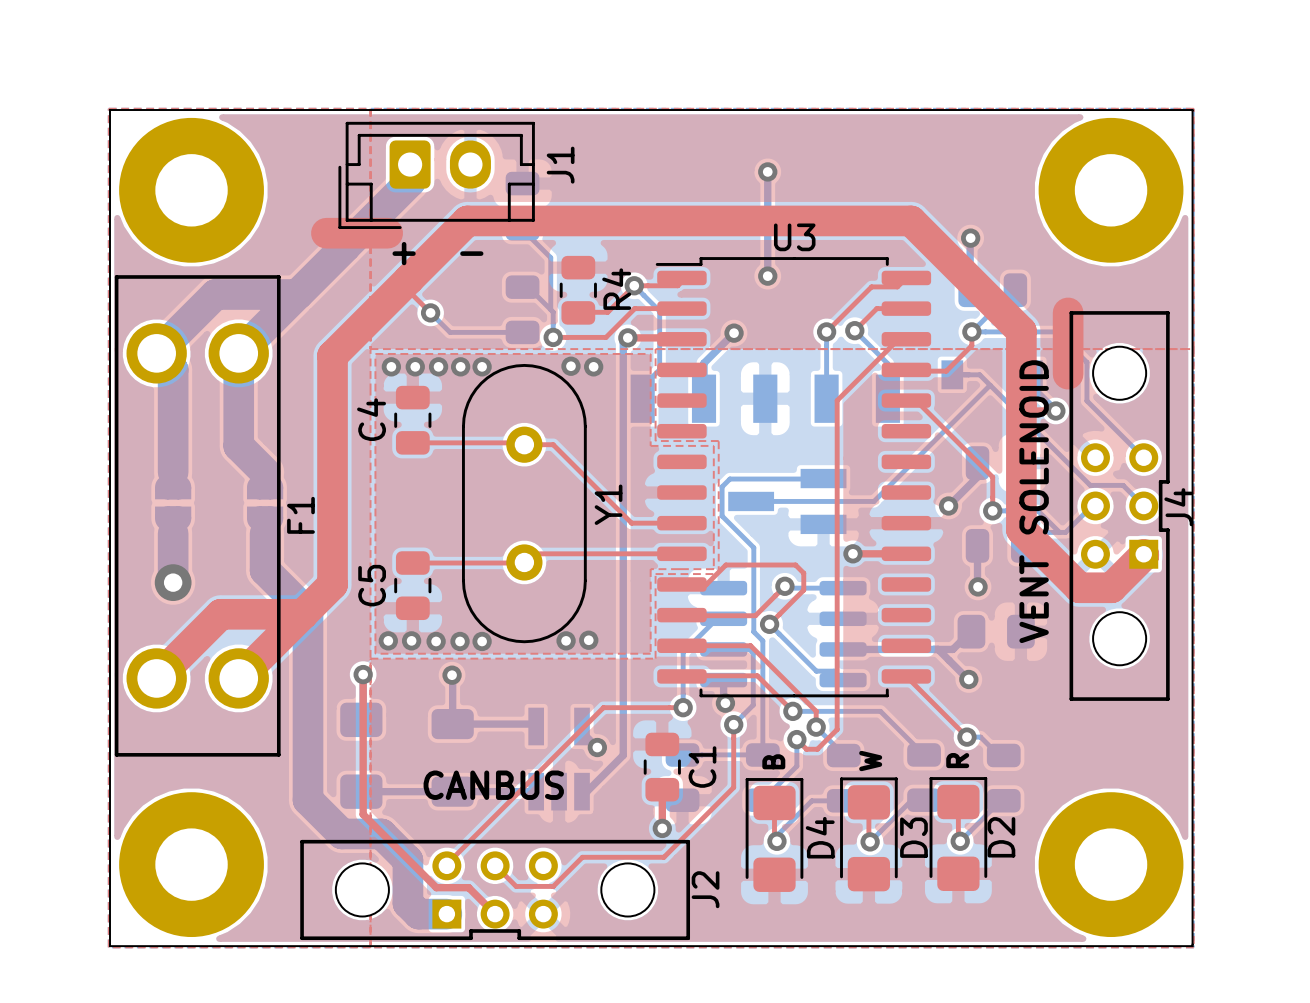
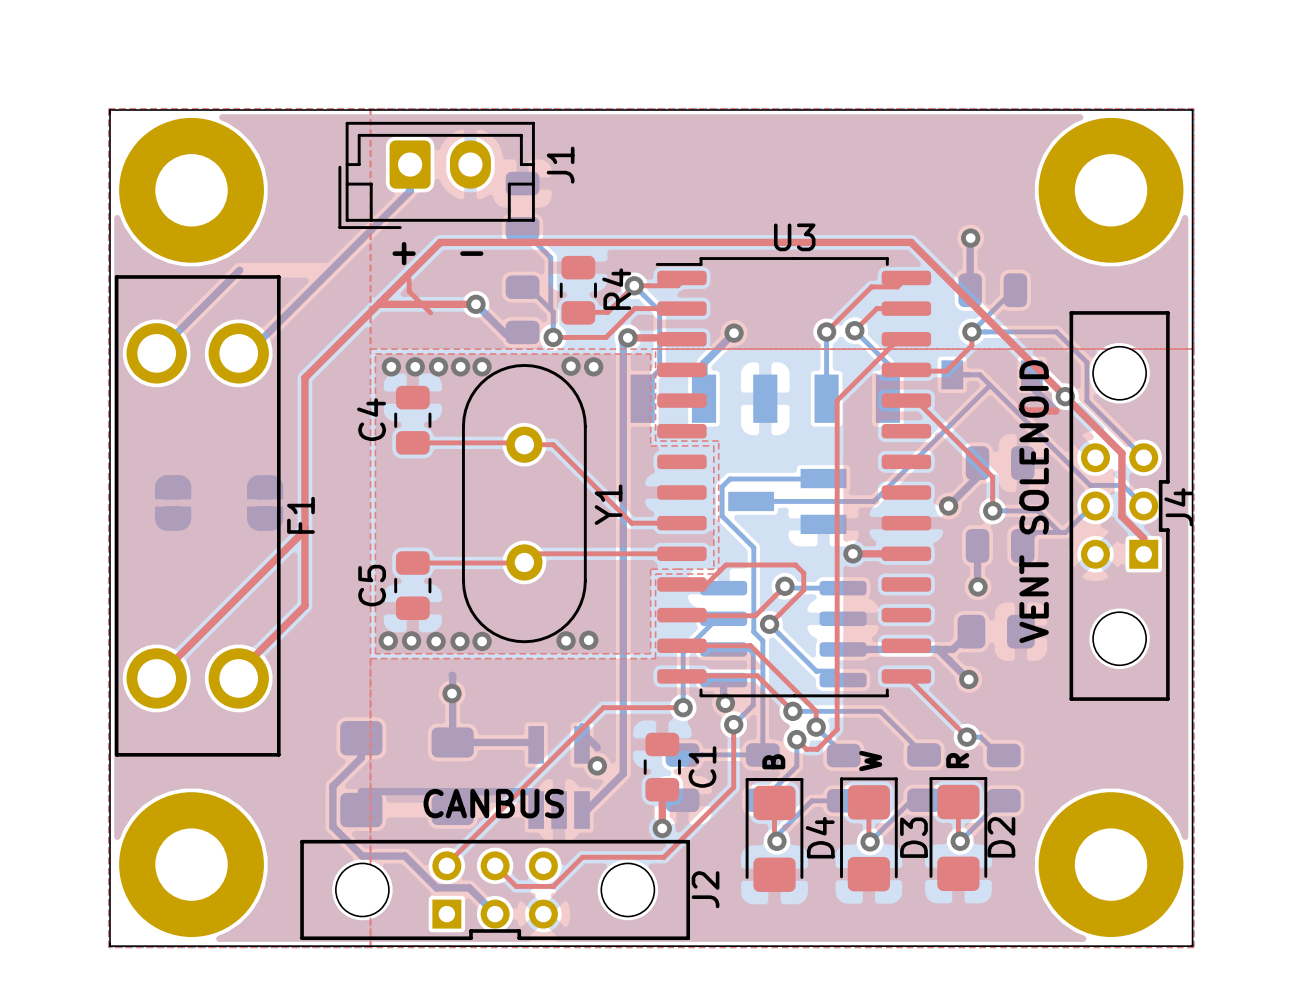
bottom track: (767, 171) (767, 276) -> none
via: (767, 171) -> none
bottom track: (410, 181) (238, 353) (238, 445) (265, 472) -> (410, 181) (410, 191) (242, 358)
top track: (326, 233) (387, 233) -> none
bottom track: none -> (239, 270) (156, 353)
via: (767, 276) -> none
bottom track: (297, 294) (215, 294) (156, 353) (173, 369) (173, 472) -> none
top track: none -> (379, 303) (475, 304)
bottom track: none -> (475, 304) (506, 334) (528, 334)
bottom track: (430, 312) (450, 332) (522, 332) -> none
via position: (430, 312) -> (475, 304)
top track: (1068, 312) (1068, 374) -> none
via position: (1055, 410) -> (1065, 396)
bottom track: (265, 518) (265, 570) (308, 613) (308, 799) (341, 833) (381, 833) (407, 860) (407, 903) (418, 914) (446, 914) -> none
bottom track: (173, 533) (173, 582) -> none
top track: (1143, 554) (1111, 587) (1079, 587) (1021, 529) (1021, 331) (911, 220) (467, 220) (332, 355) (332, 584) (238, 678) -> (1143, 554) (1143, 538) (1121, 516) (1121, 453) (911, 242) (440, 242) (304, 377) (304, 605) (228, 682)
via: (173, 582) -> none
top track: (220, 614) (302, 614) -> (220, 614) (304, 530)
top track width: thick (220, 614) (156, 678) -> thin (220, 614) (156, 678)
top track: (363, 674) (363, 814) (436, 887) (468, 887) (495, 914) -> none
via: (363, 674) -> none
via position: (452, 675) -> (452, 693)
bottom track: (452, 724) (537, 724) -> (452, 724) (452, 742) (537, 742)
bottom track: none -> (361, 738) (361, 757) (332, 786) (332, 826) (362, 856) (404, 856) (436, 887) (469, 887) (501, 919)
via position: (597, 747) -> (597, 765)
part position: (361, 755) -> (361, 774)
bottom track: (623, 755) (586, 791) (582, 791) -> (623, 755) (623, 773) (586, 810) (582, 810)
part position: (452, 757) -> (452, 776)
part position: (559, 759) -> (559, 777)
text position: CANBUS (493, 785) -> CANBUS (493, 803)

